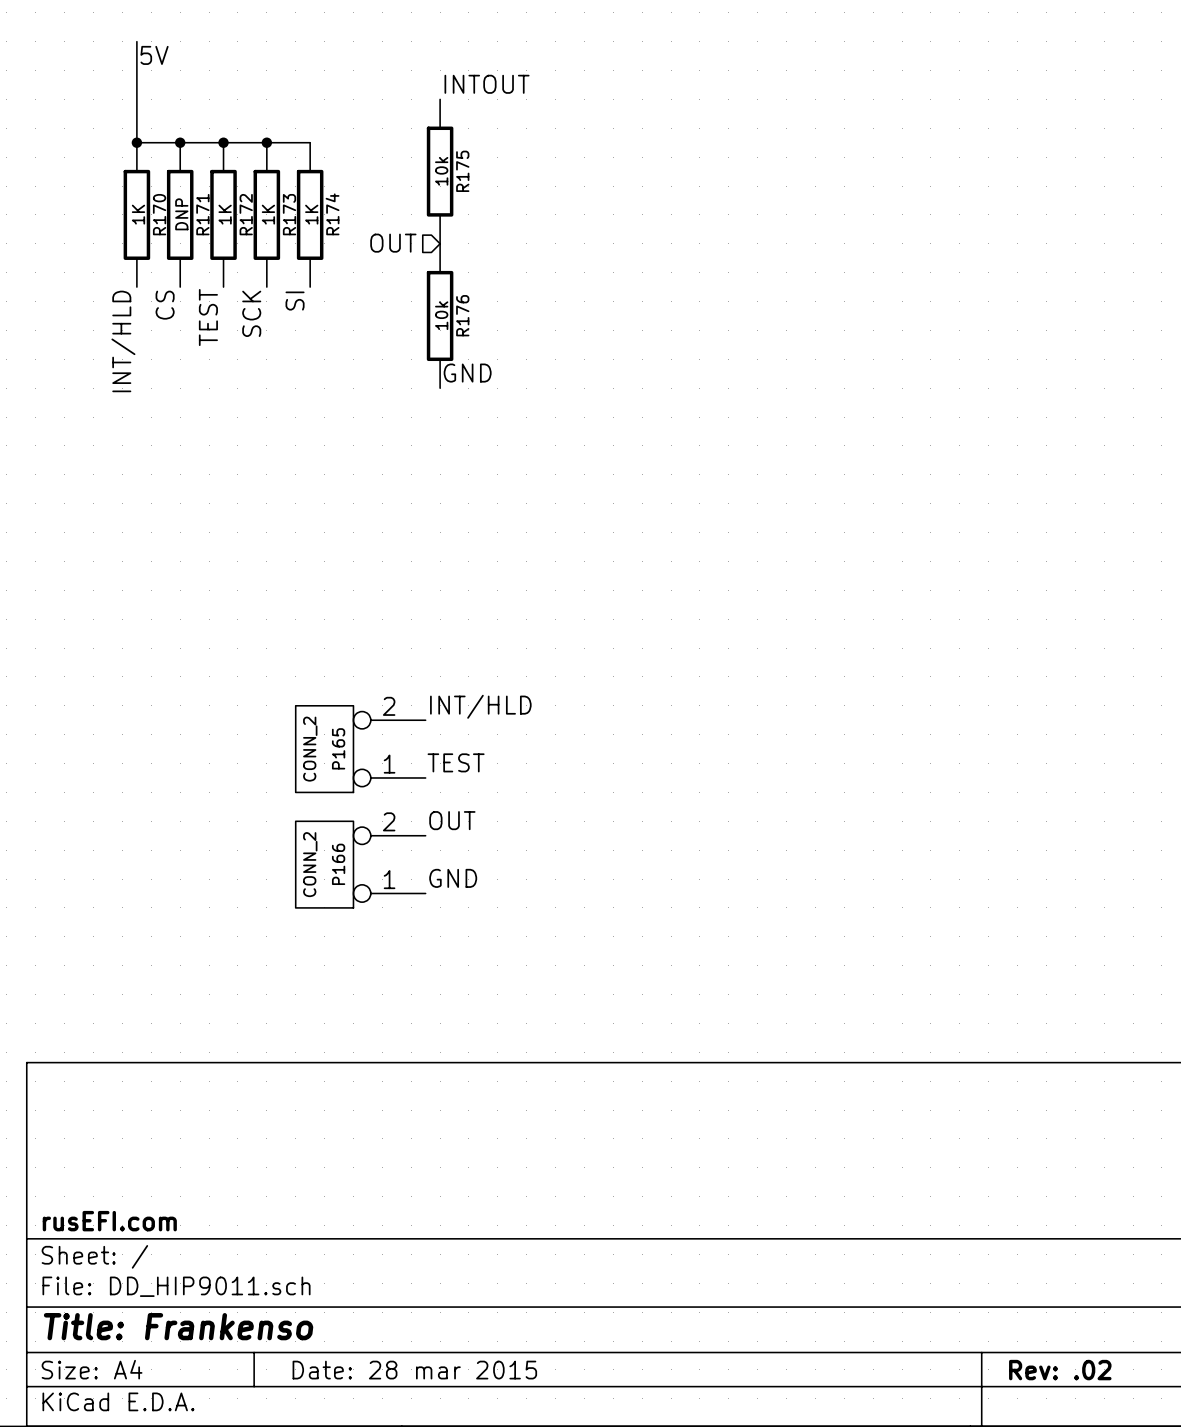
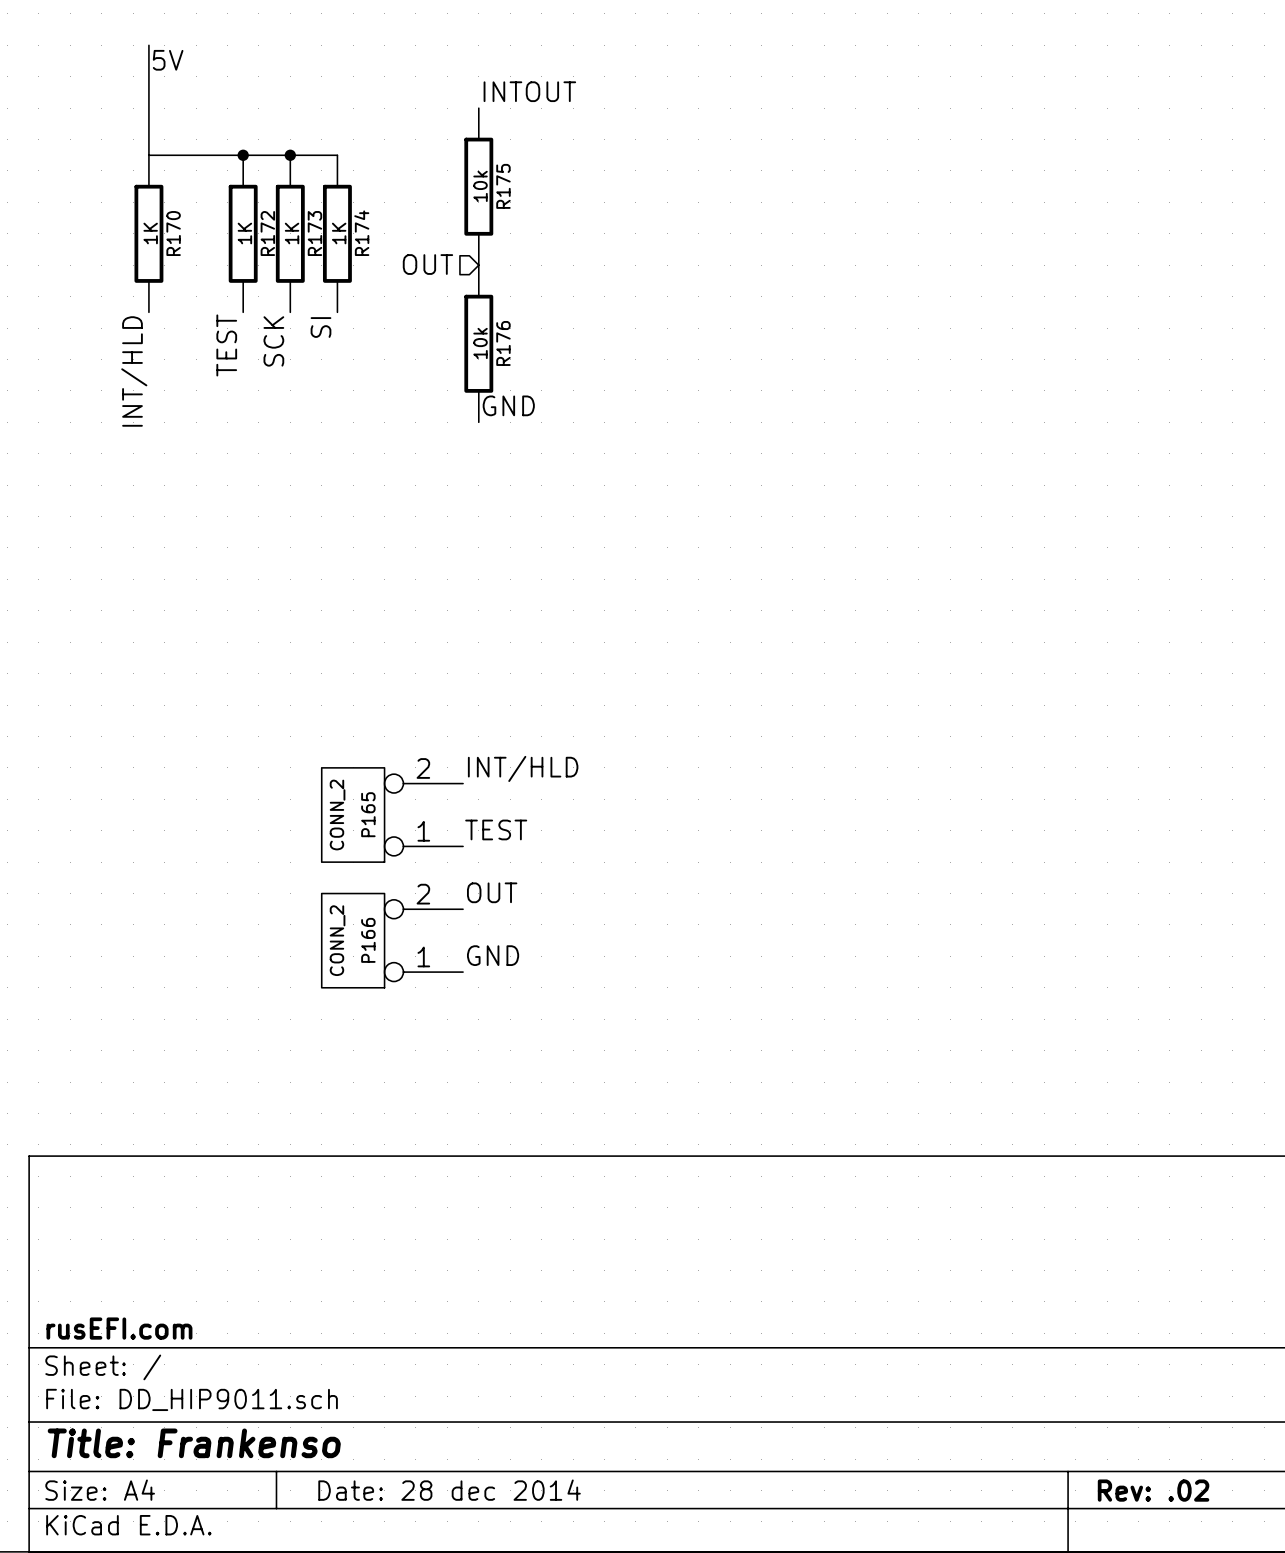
junction: (136, 142) -> none
junction: (180, 142) -> none
R171: DNP (180, 214) -> none
label: CS (165, 305) -> none
title block: Date: 28 mar 2015 (414, 1370) -> Date: 28 dec 2014 (449, 1490)

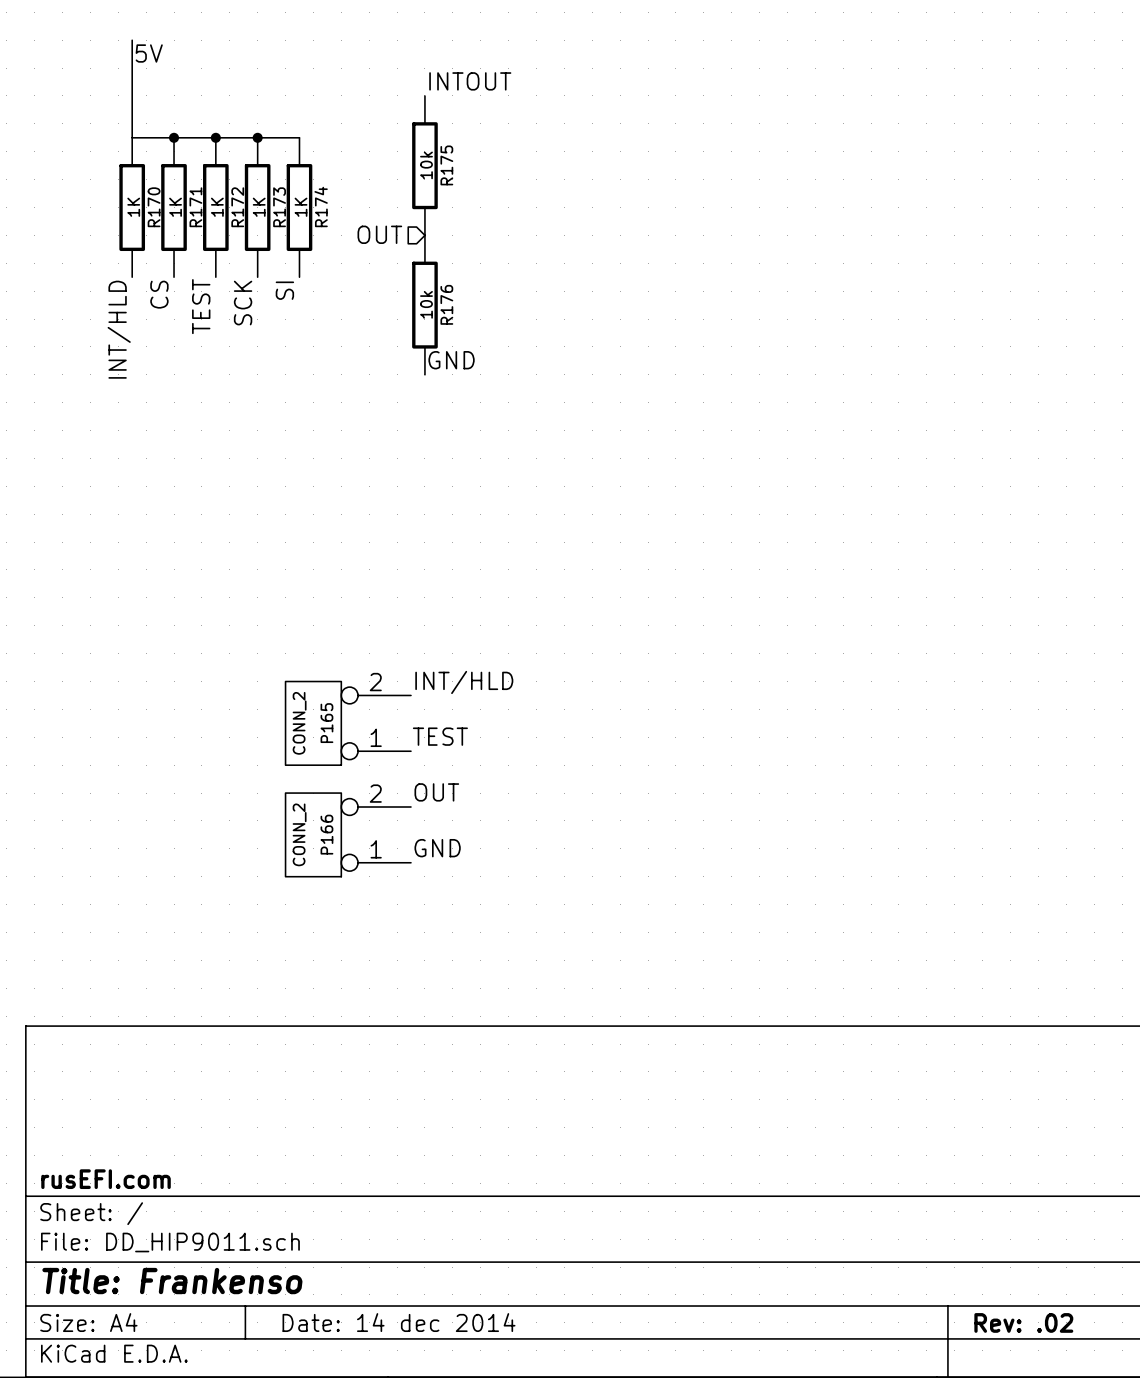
junction: none -> (174, 137)
R171: none -> 1K (174, 207)
label: none -> CS (159, 294)
title block: Date: 28 dec 2014 (449, 1490) -> Date: 14 dec 2014 (399, 1322)

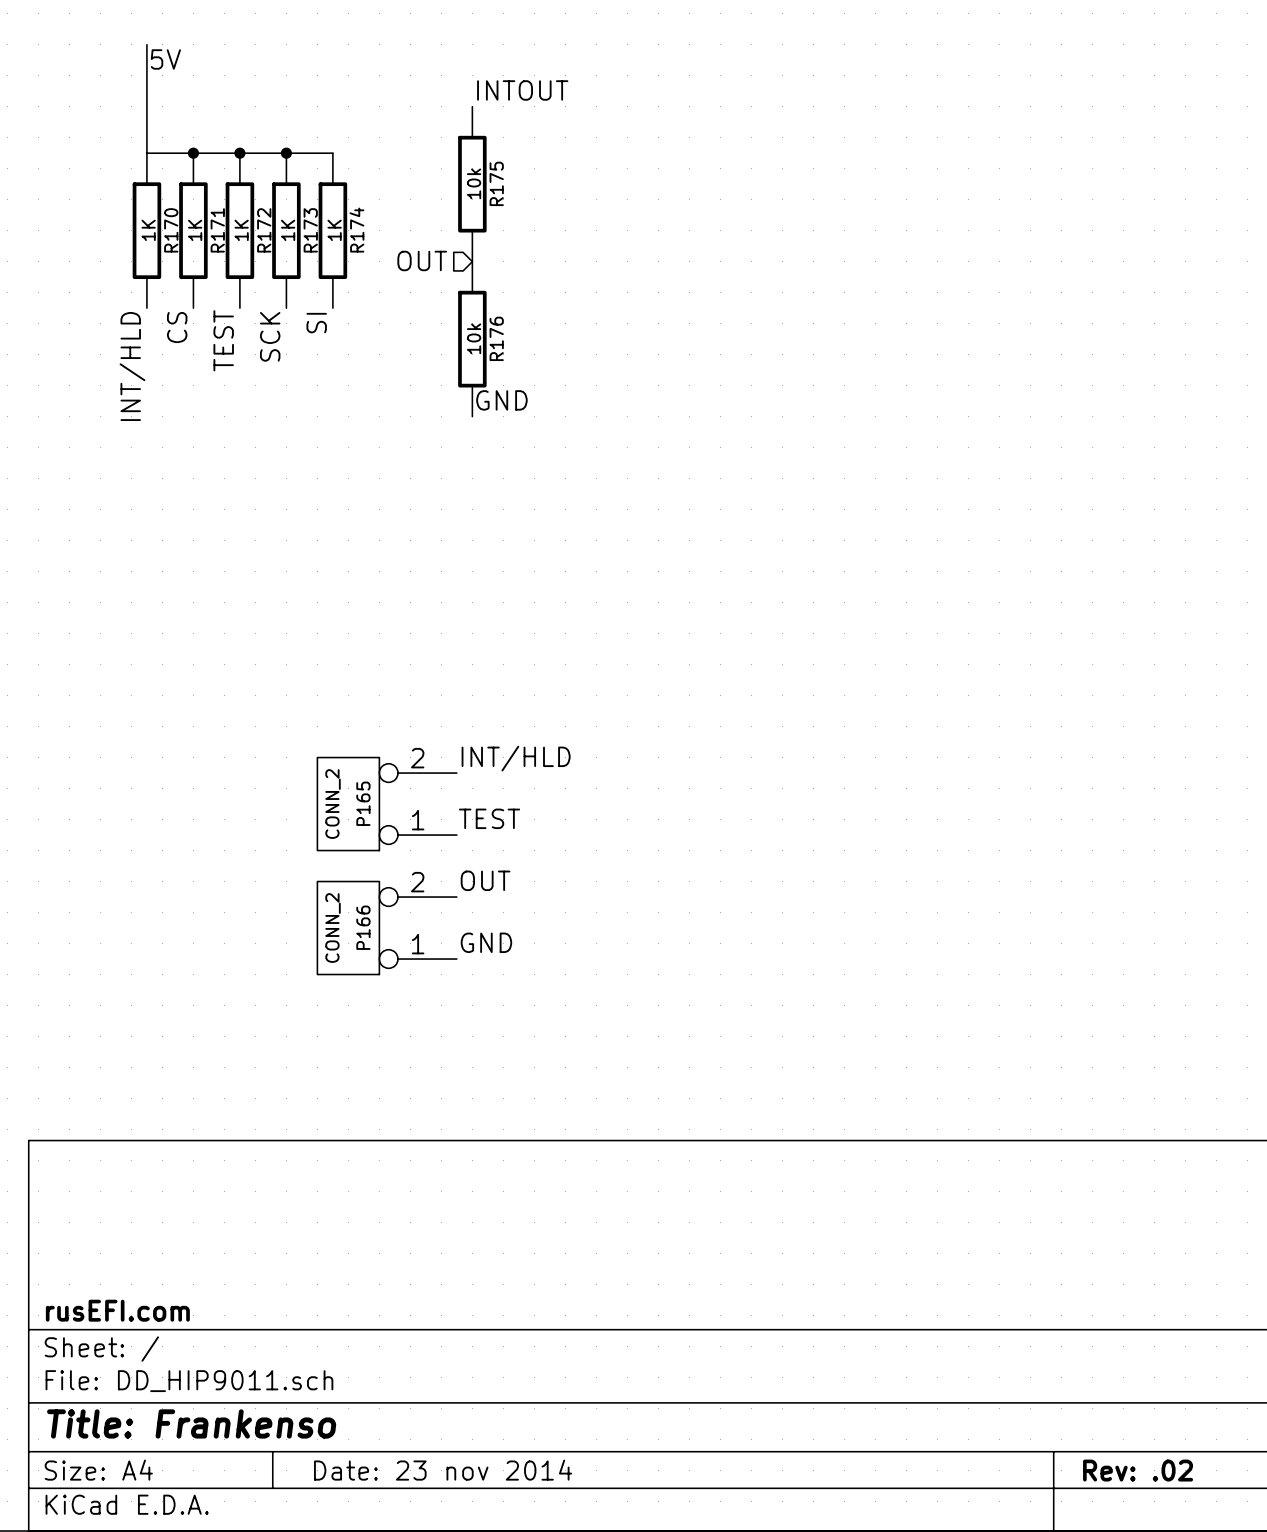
title block: Date: 14 dec 2014 (399, 1322) -> Date: 23 nov 2014 (443, 1470)

